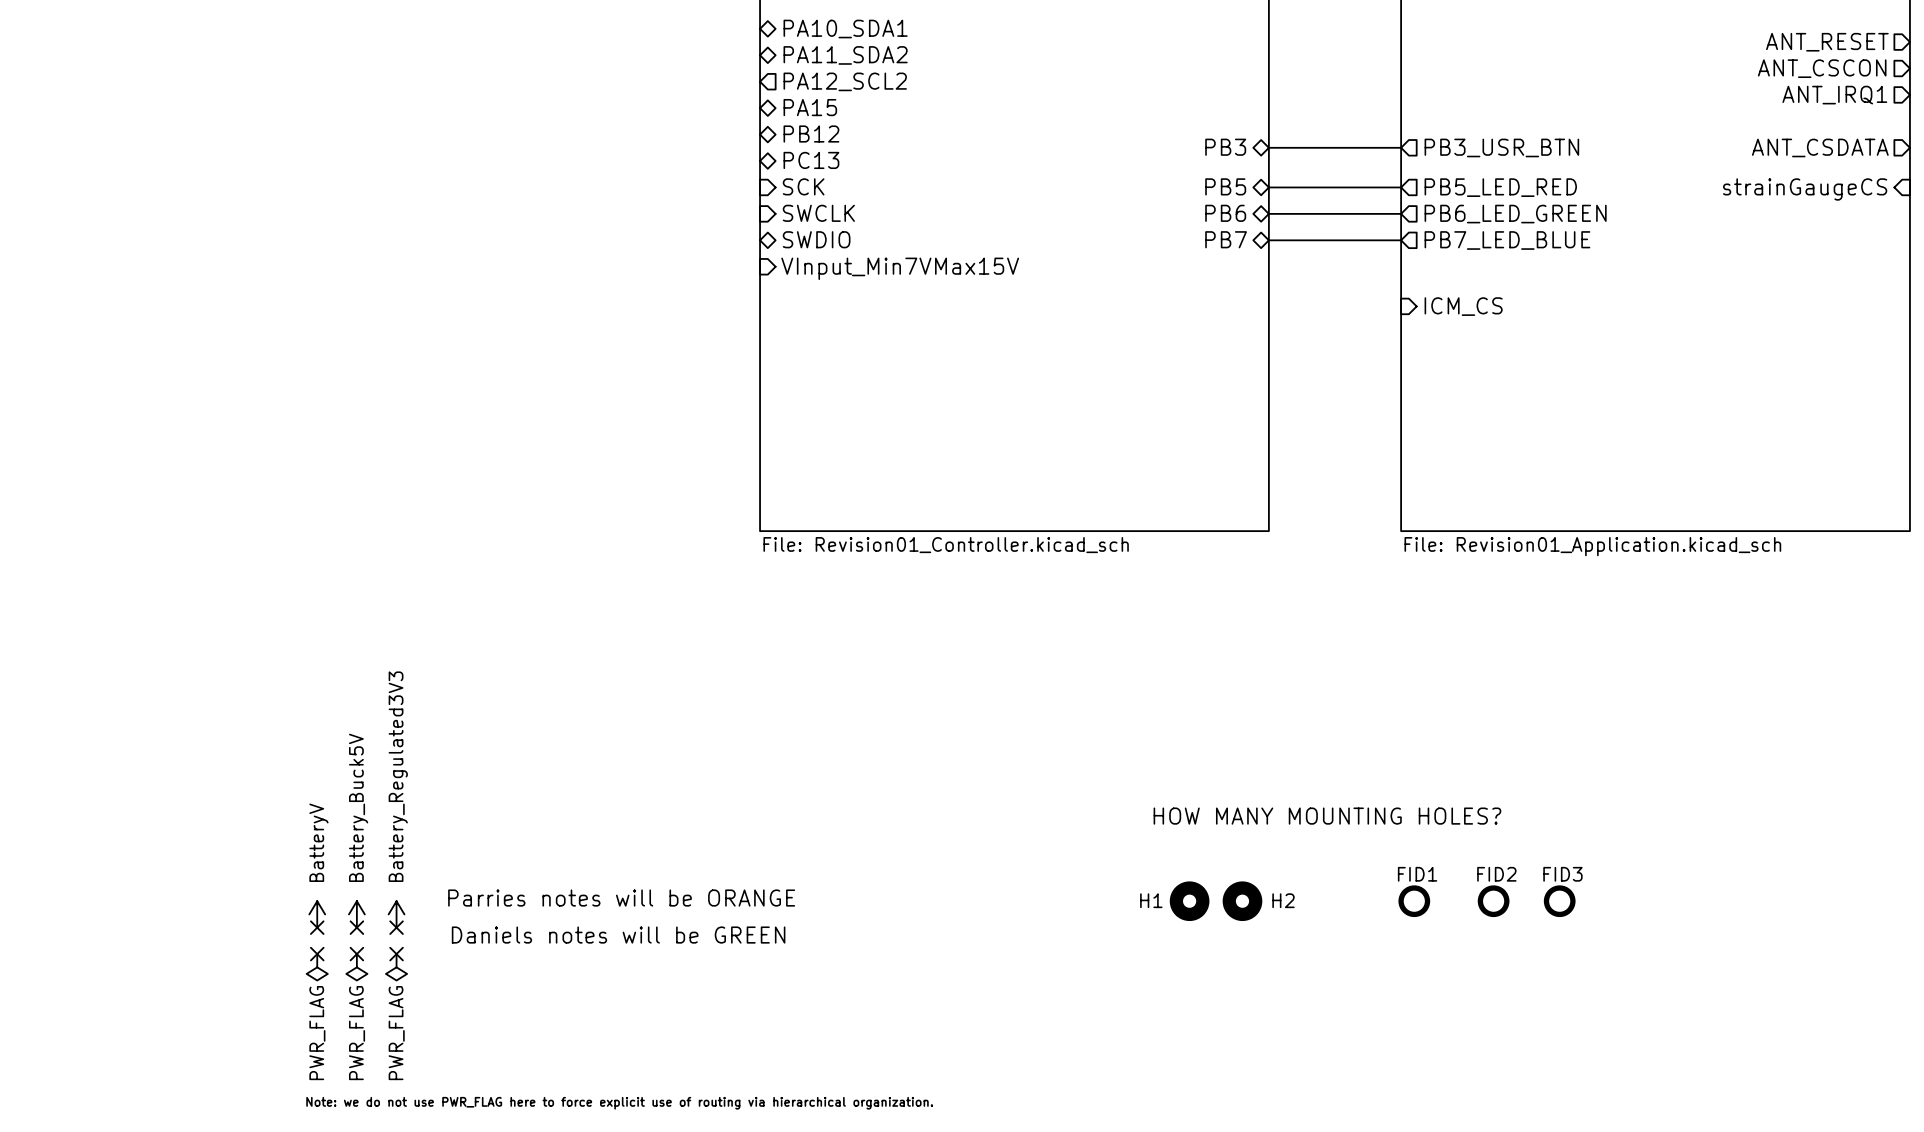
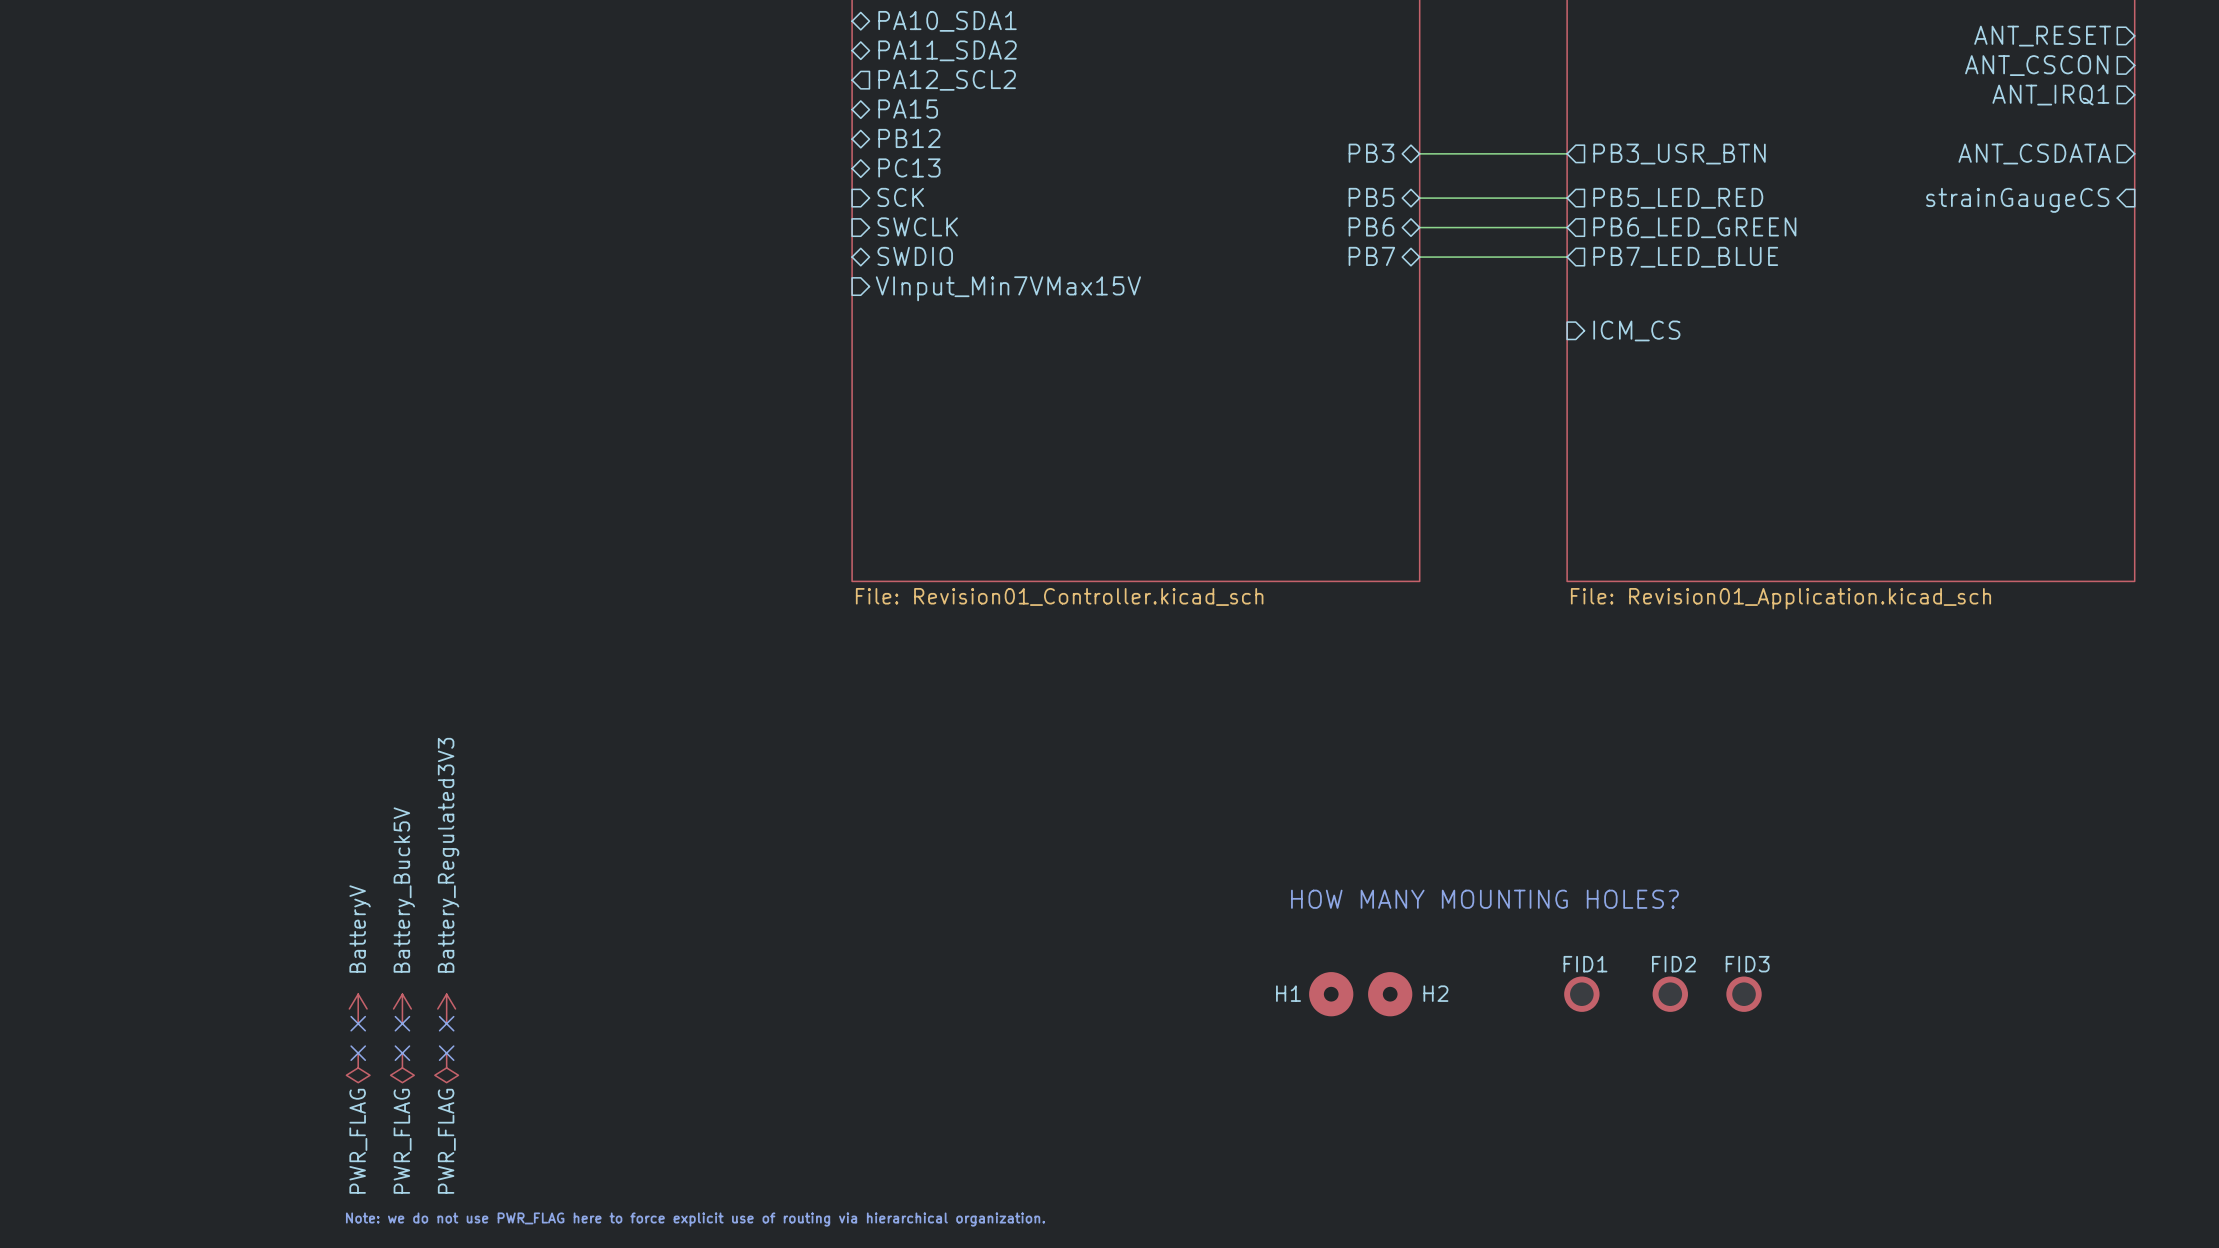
text: Parries notes will be ORANGE (621, 898) -> none
text: Daniels notes will be GREEN (618, 935) -> none

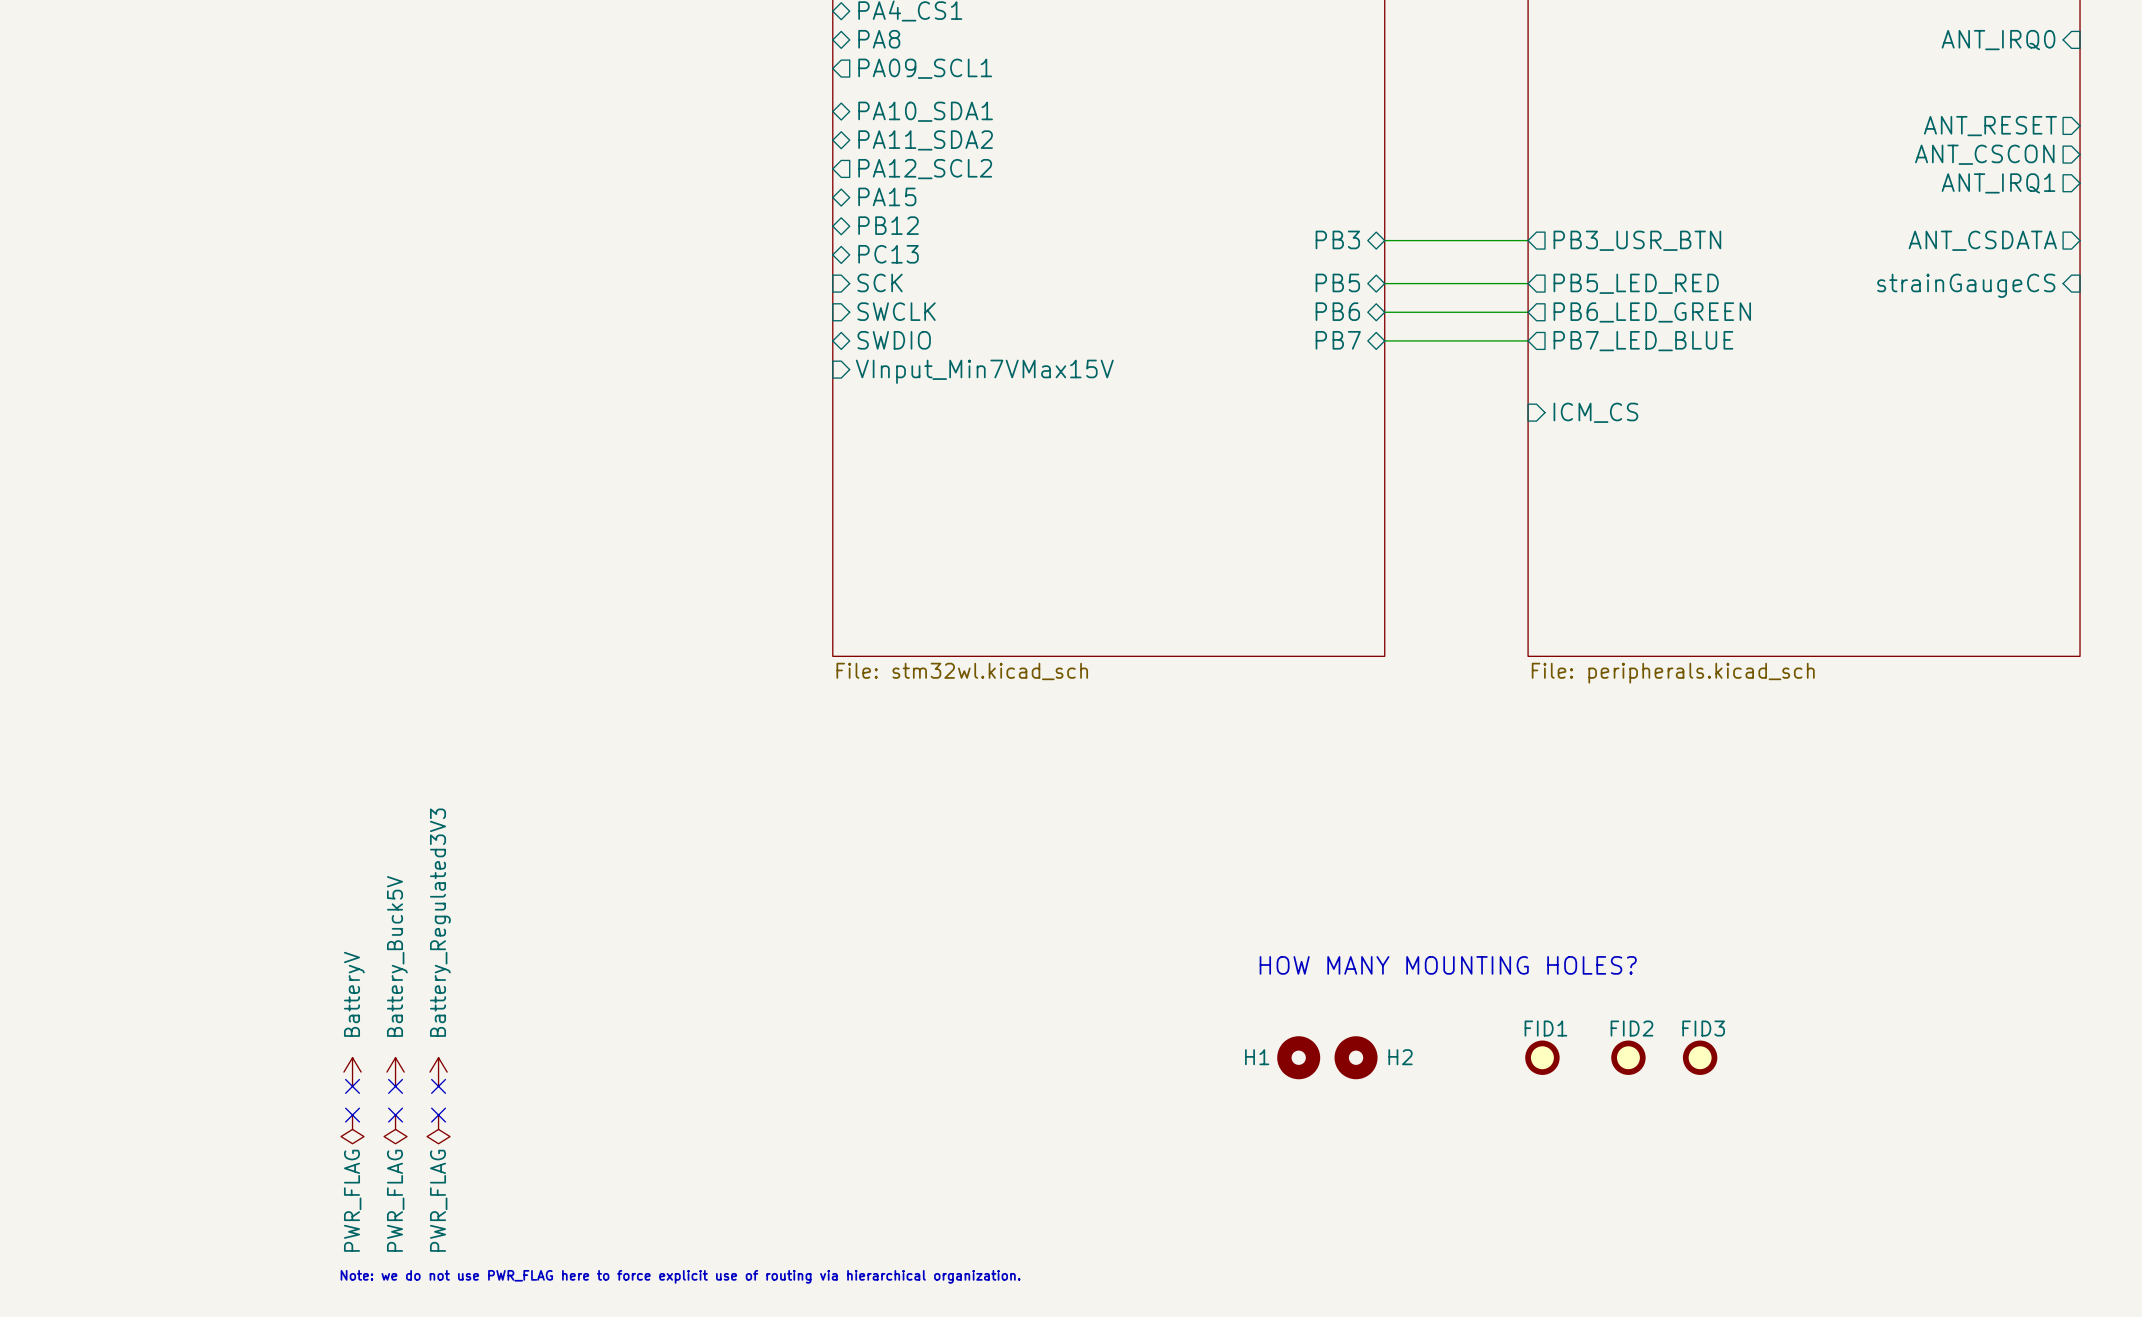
sheet value: File: Revision01_Controller.kicad_sch (1059, 596) -> File: stm32wl.kicad_sch (962, 671)
sheet value: File: Revision01_Application.kicad_sch (1780, 598) -> File: peripherals.kicad_sch (1673, 673)

